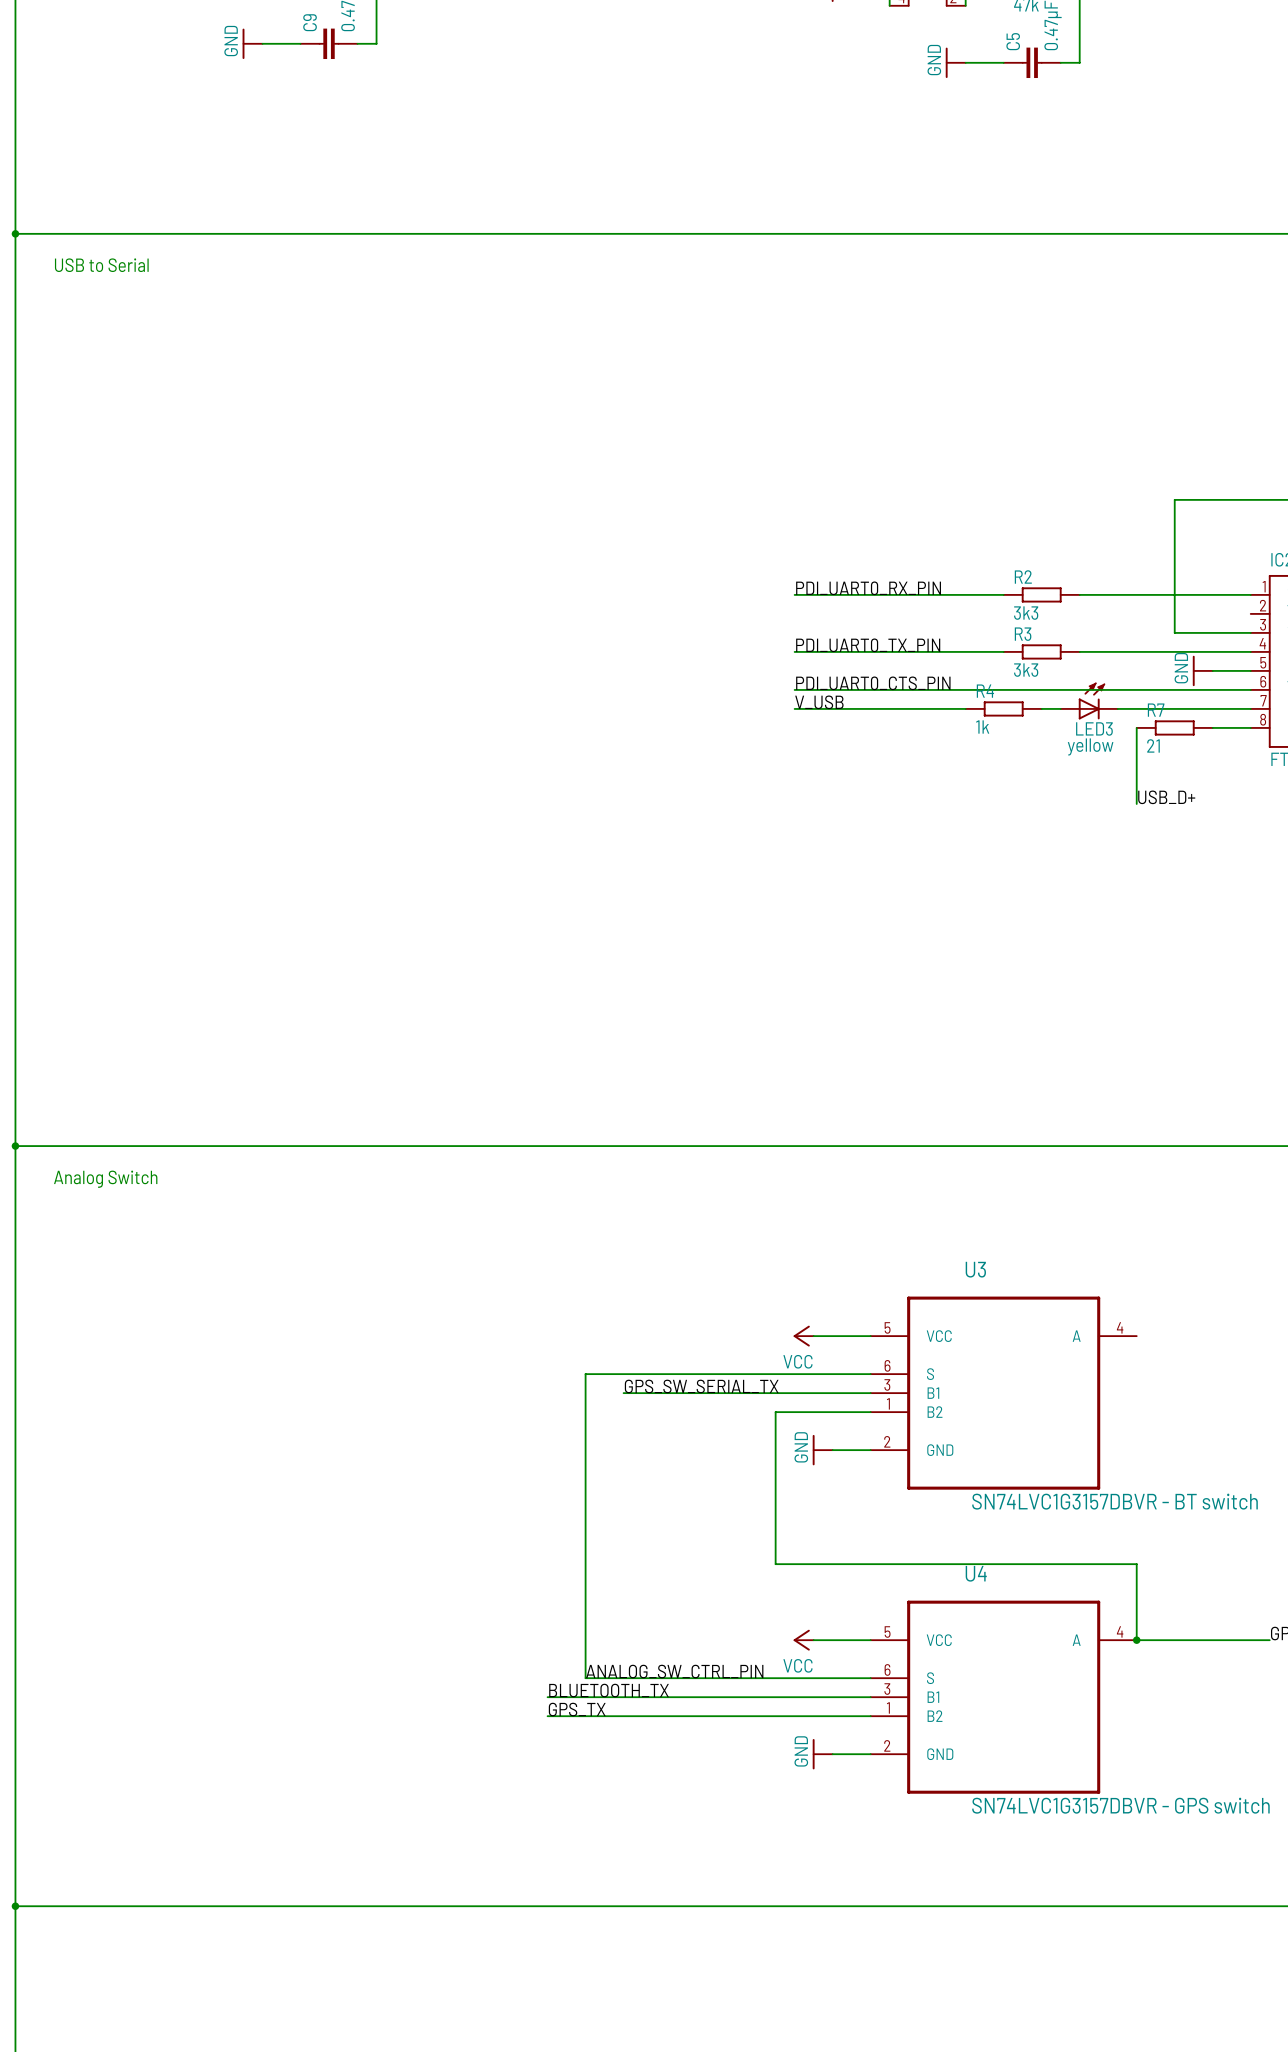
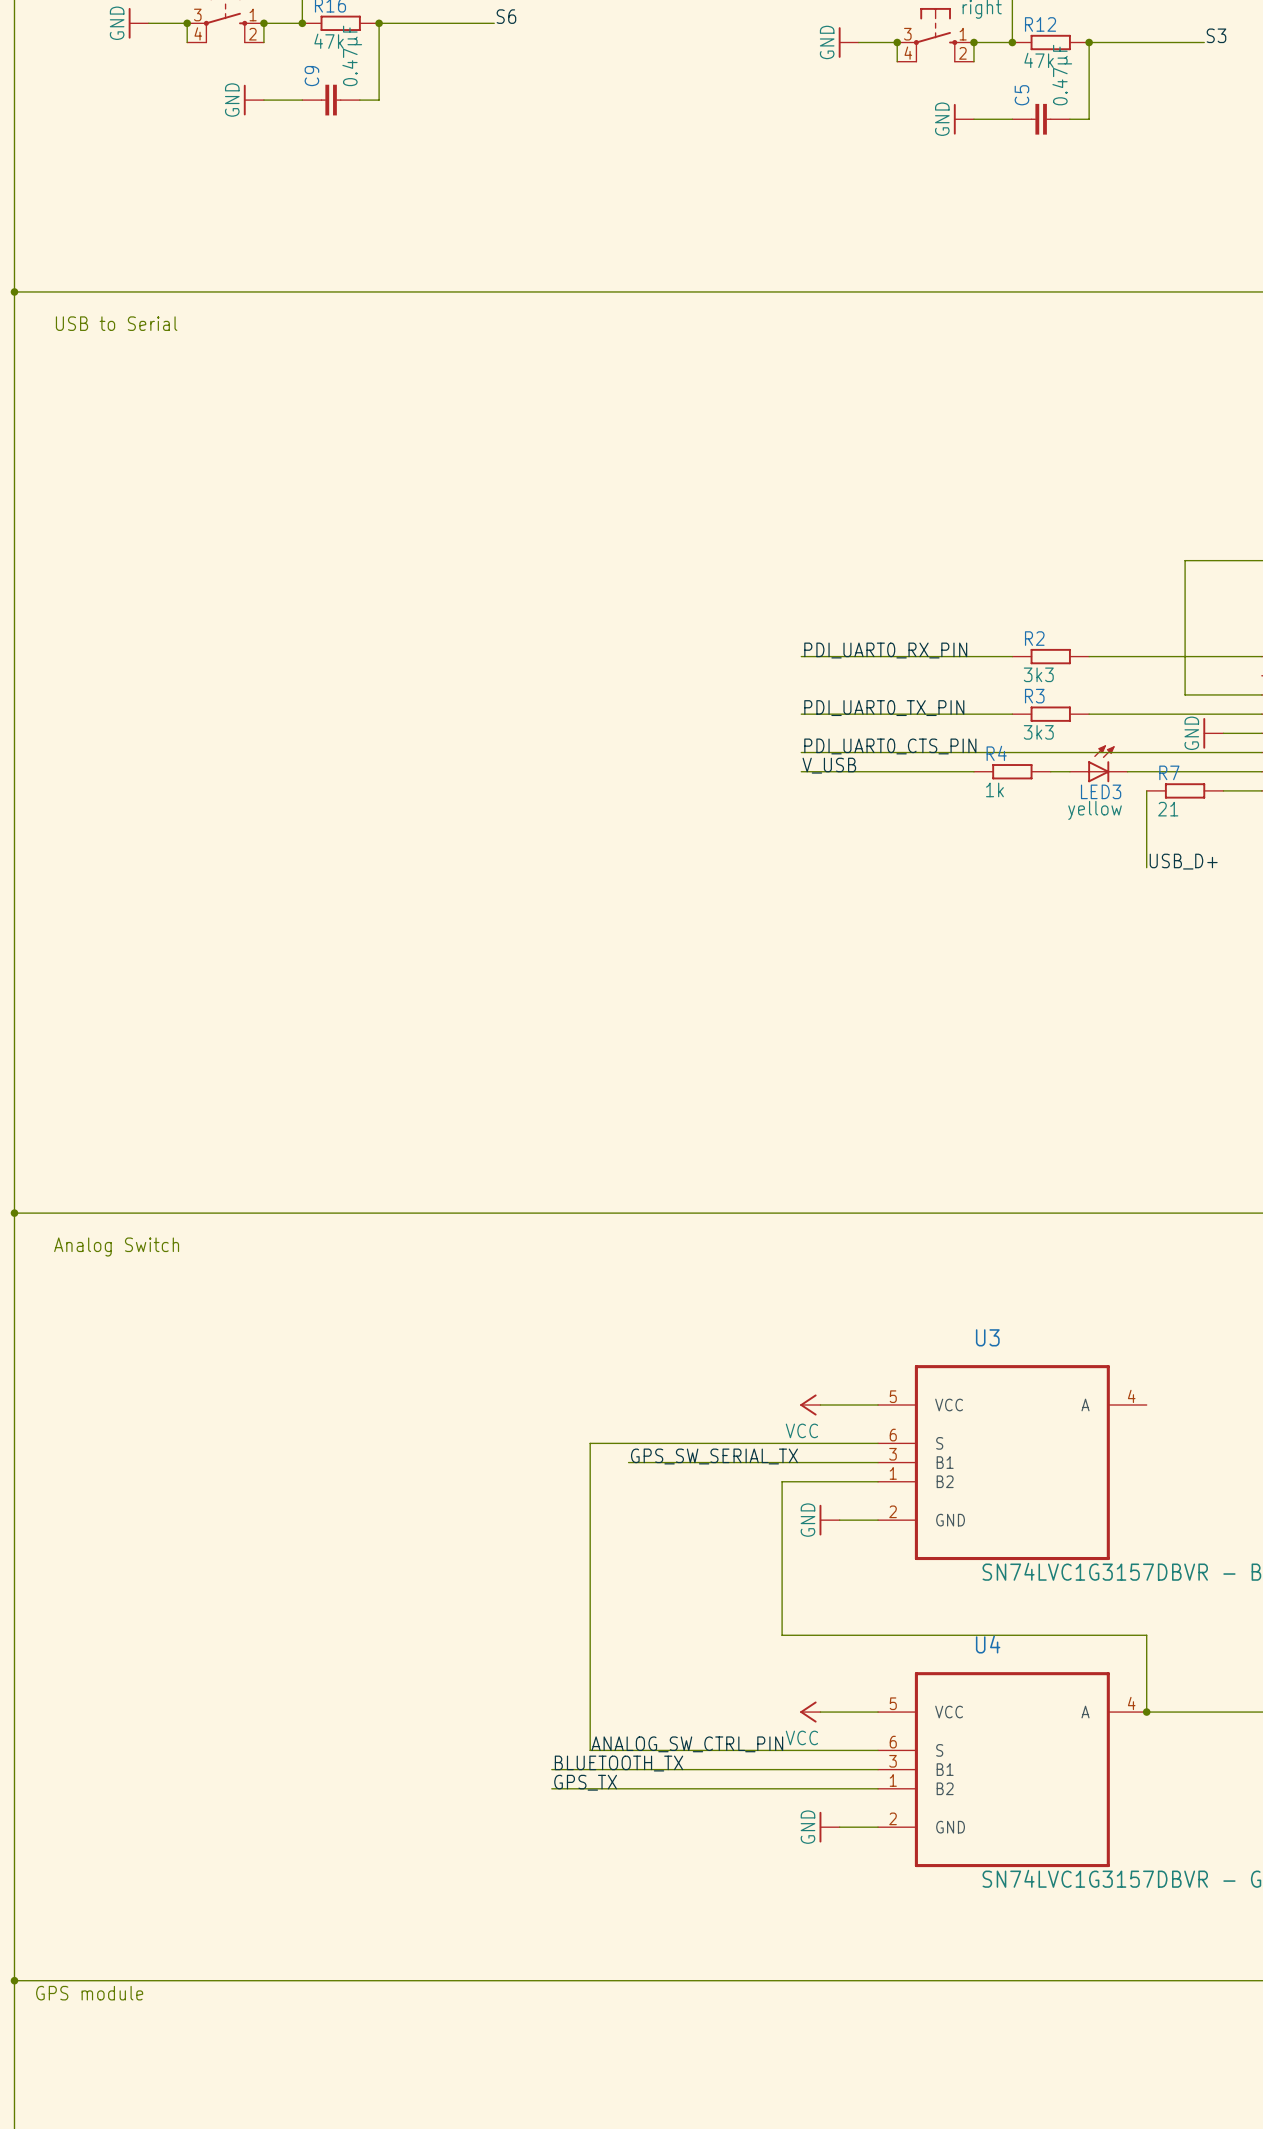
text: none -> GPS module (89, 1993)

